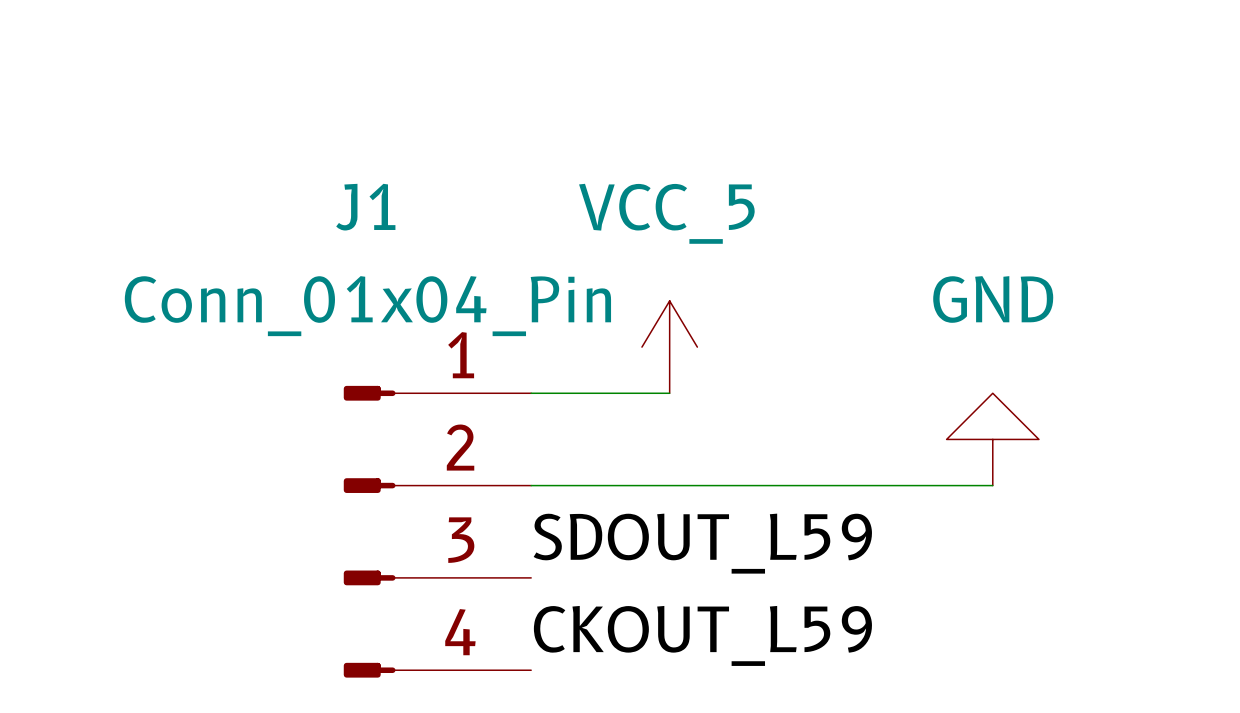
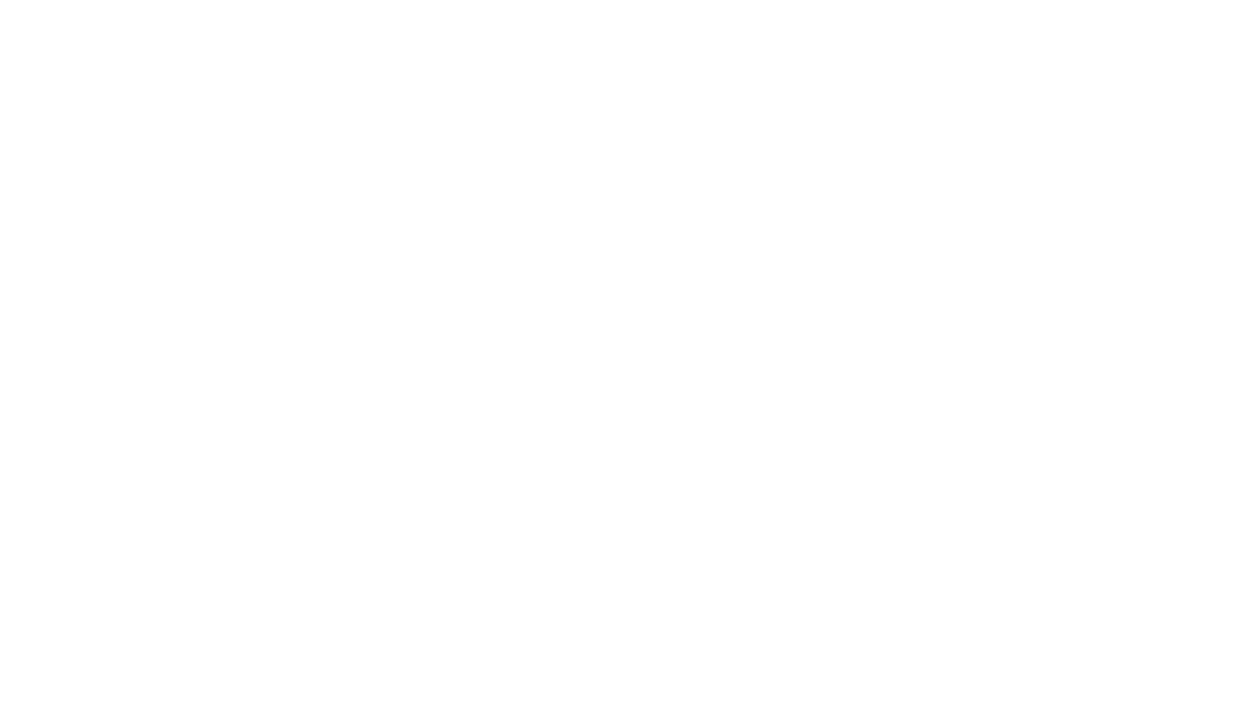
power symbol: VCC_5 (669, 347) -> none
wire: (531, 393) (669, 393) -> none
power symbol: GND (992, 439) -> none
wire: (531, 485) (992, 485) -> none
J1: Conn_01x04_Pin (437, 531) -> none
label: SDOUT_L59 (702, 543) -> none
label: CKOUT_L59 (702, 635) -> none

